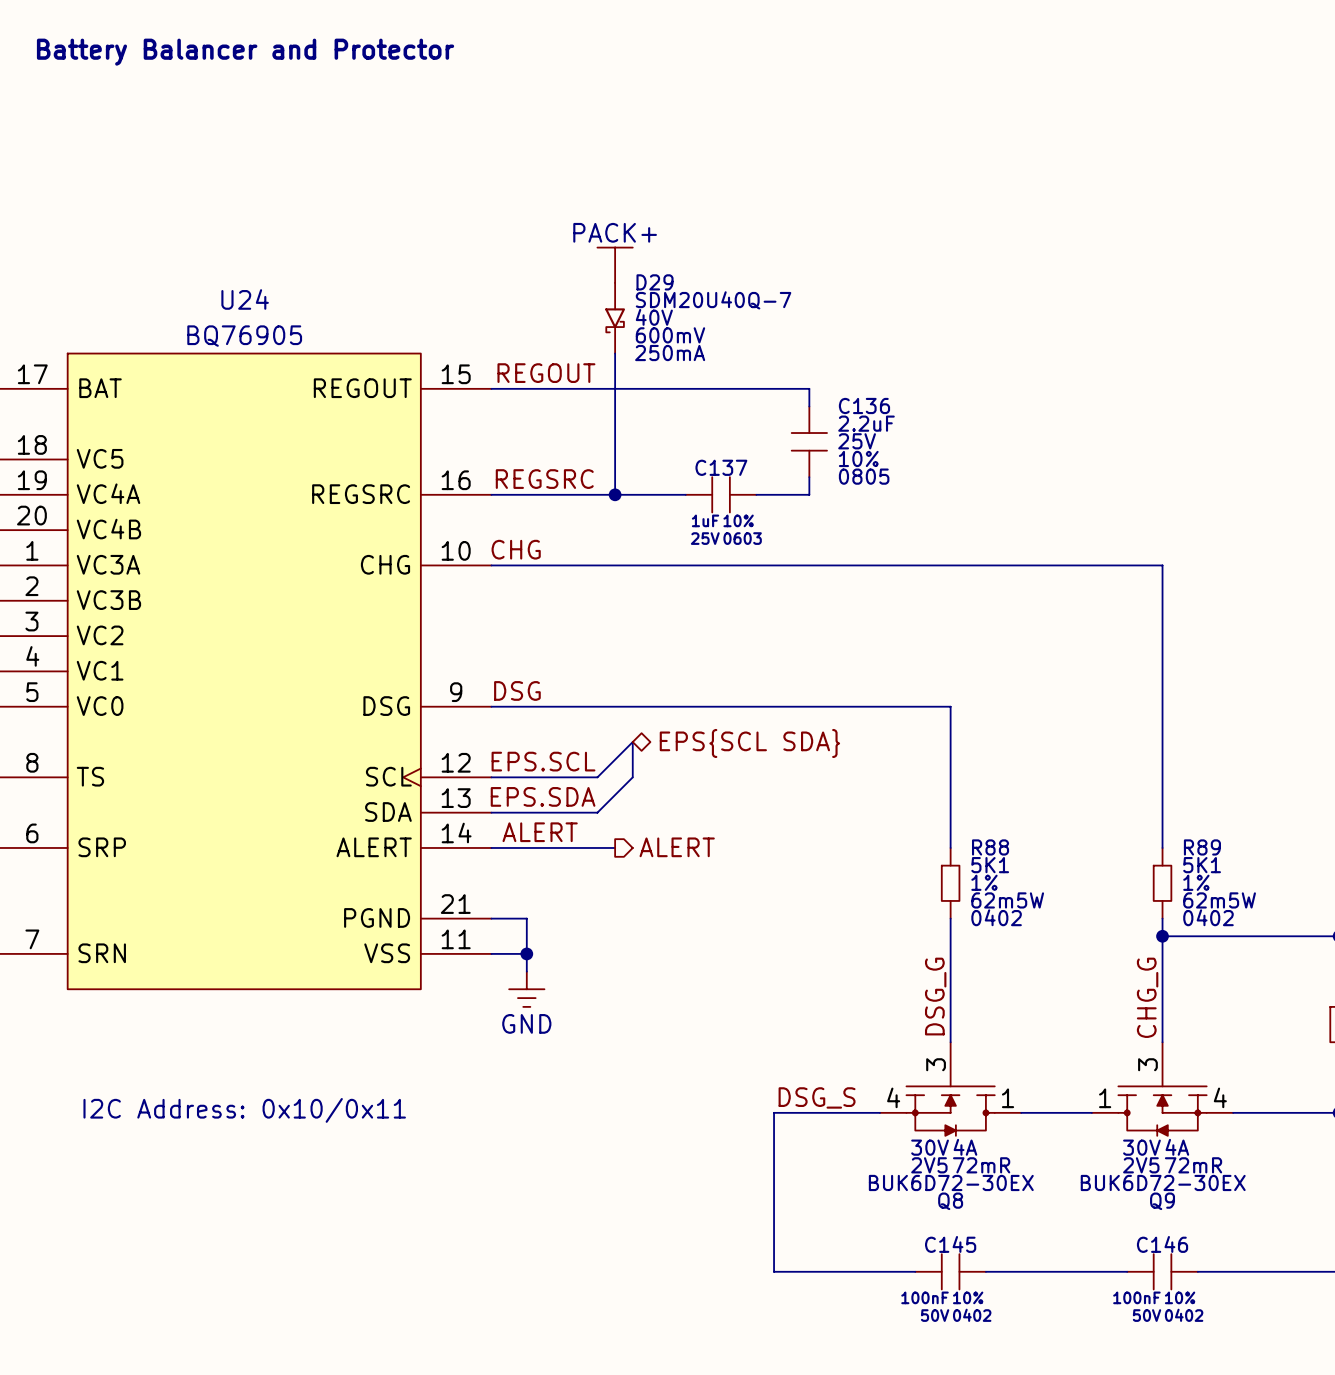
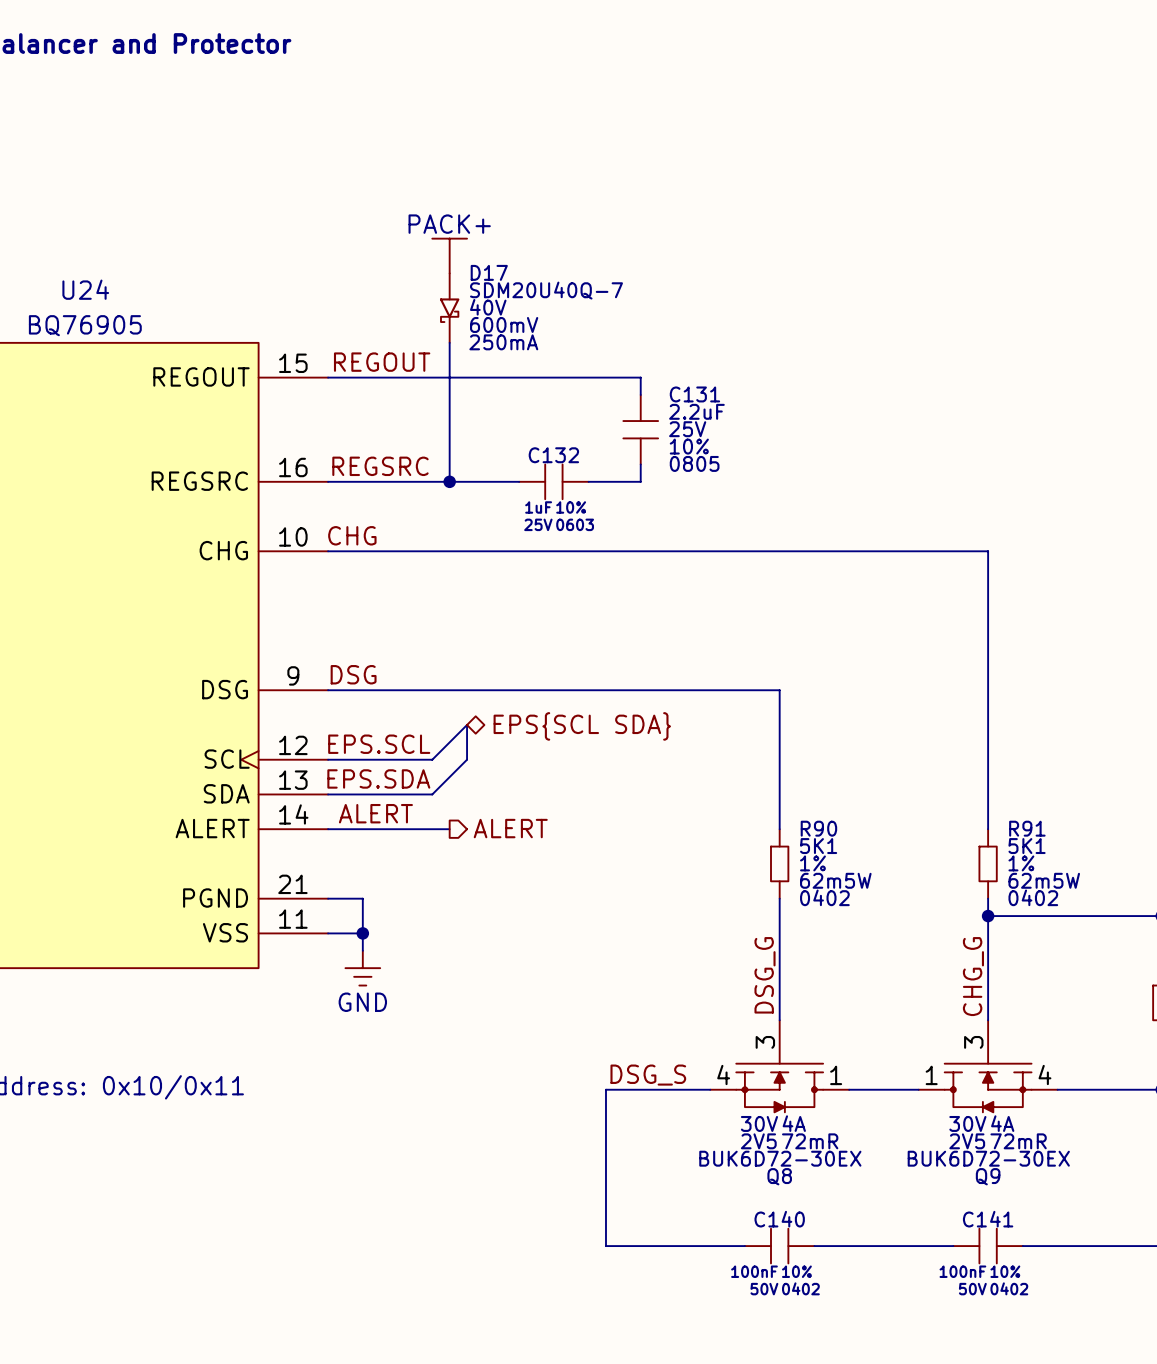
D29 name: D29 (655, 282) -> D17 (489, 272)
C136 name: C136 (864, 405) -> C131 (694, 394)
C137 name: C137 (721, 467) -> C132 (553, 455)
R88 name: R88 (990, 847) -> R90 (818, 828)
R89 name: R89 (1202, 847) -> R91 (1027, 828)
C145 name: C145 (950, 1244) -> C140 (779, 1219)
C146 name: C146 (1162, 1244) -> C141 (988, 1219)

